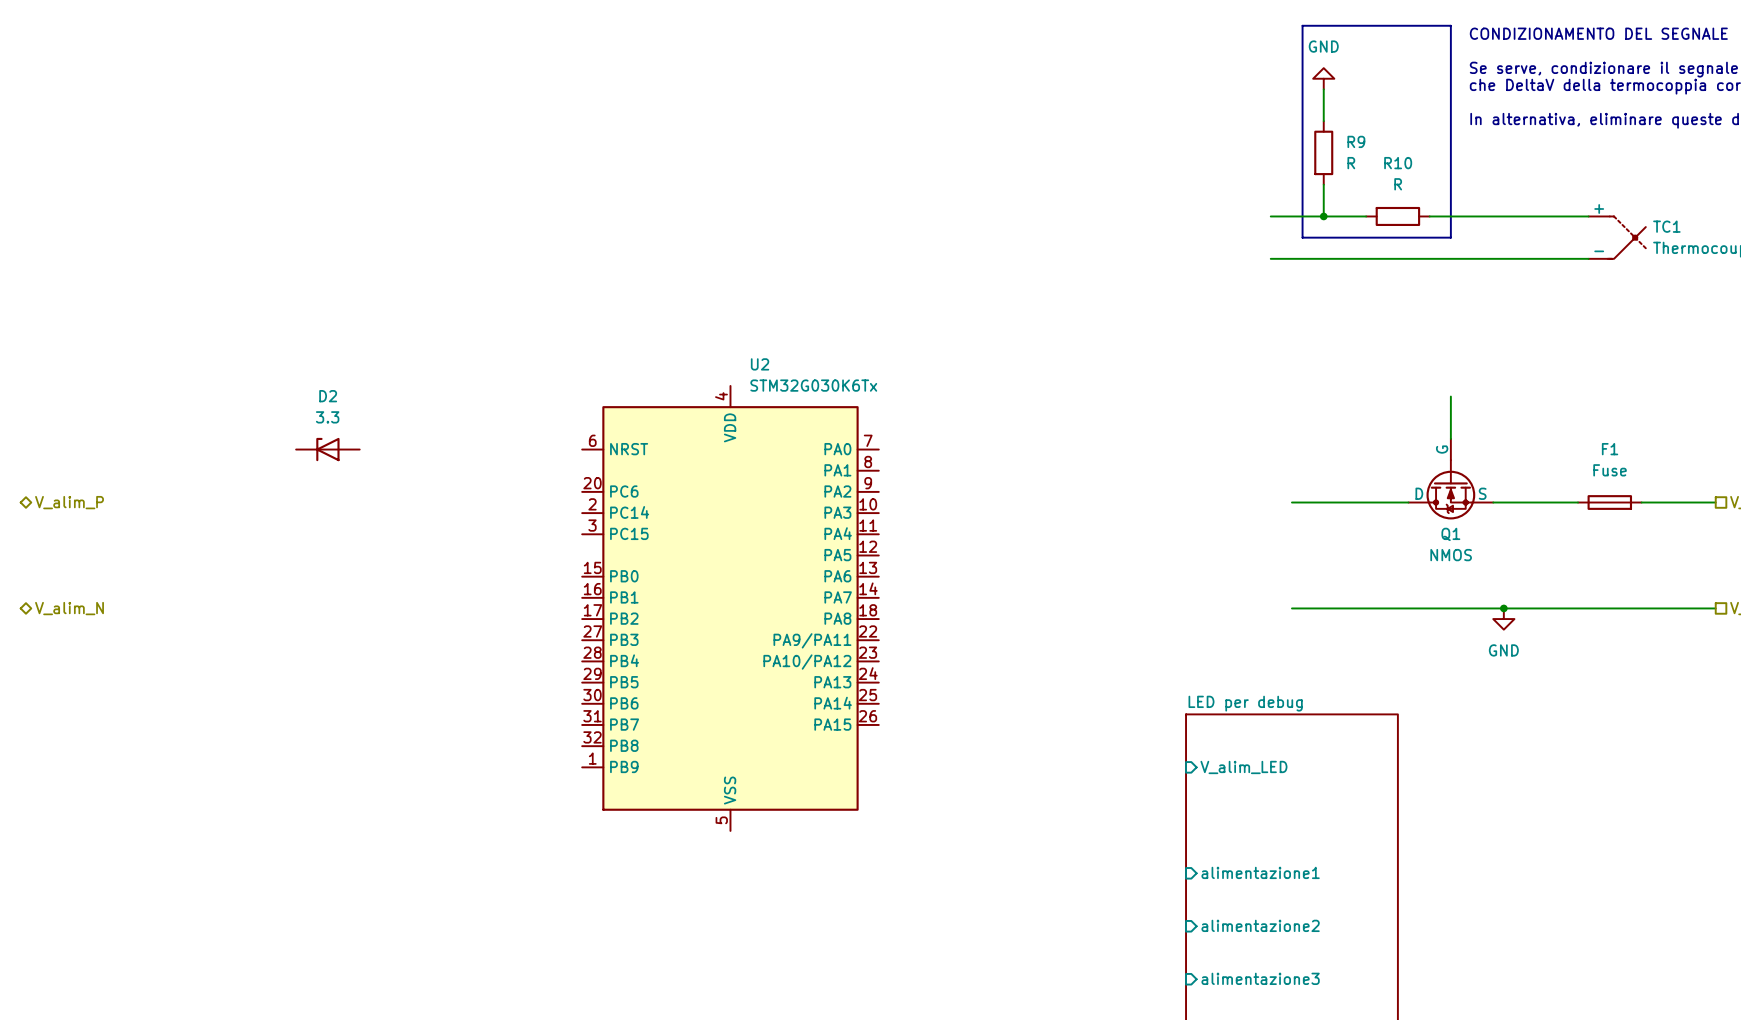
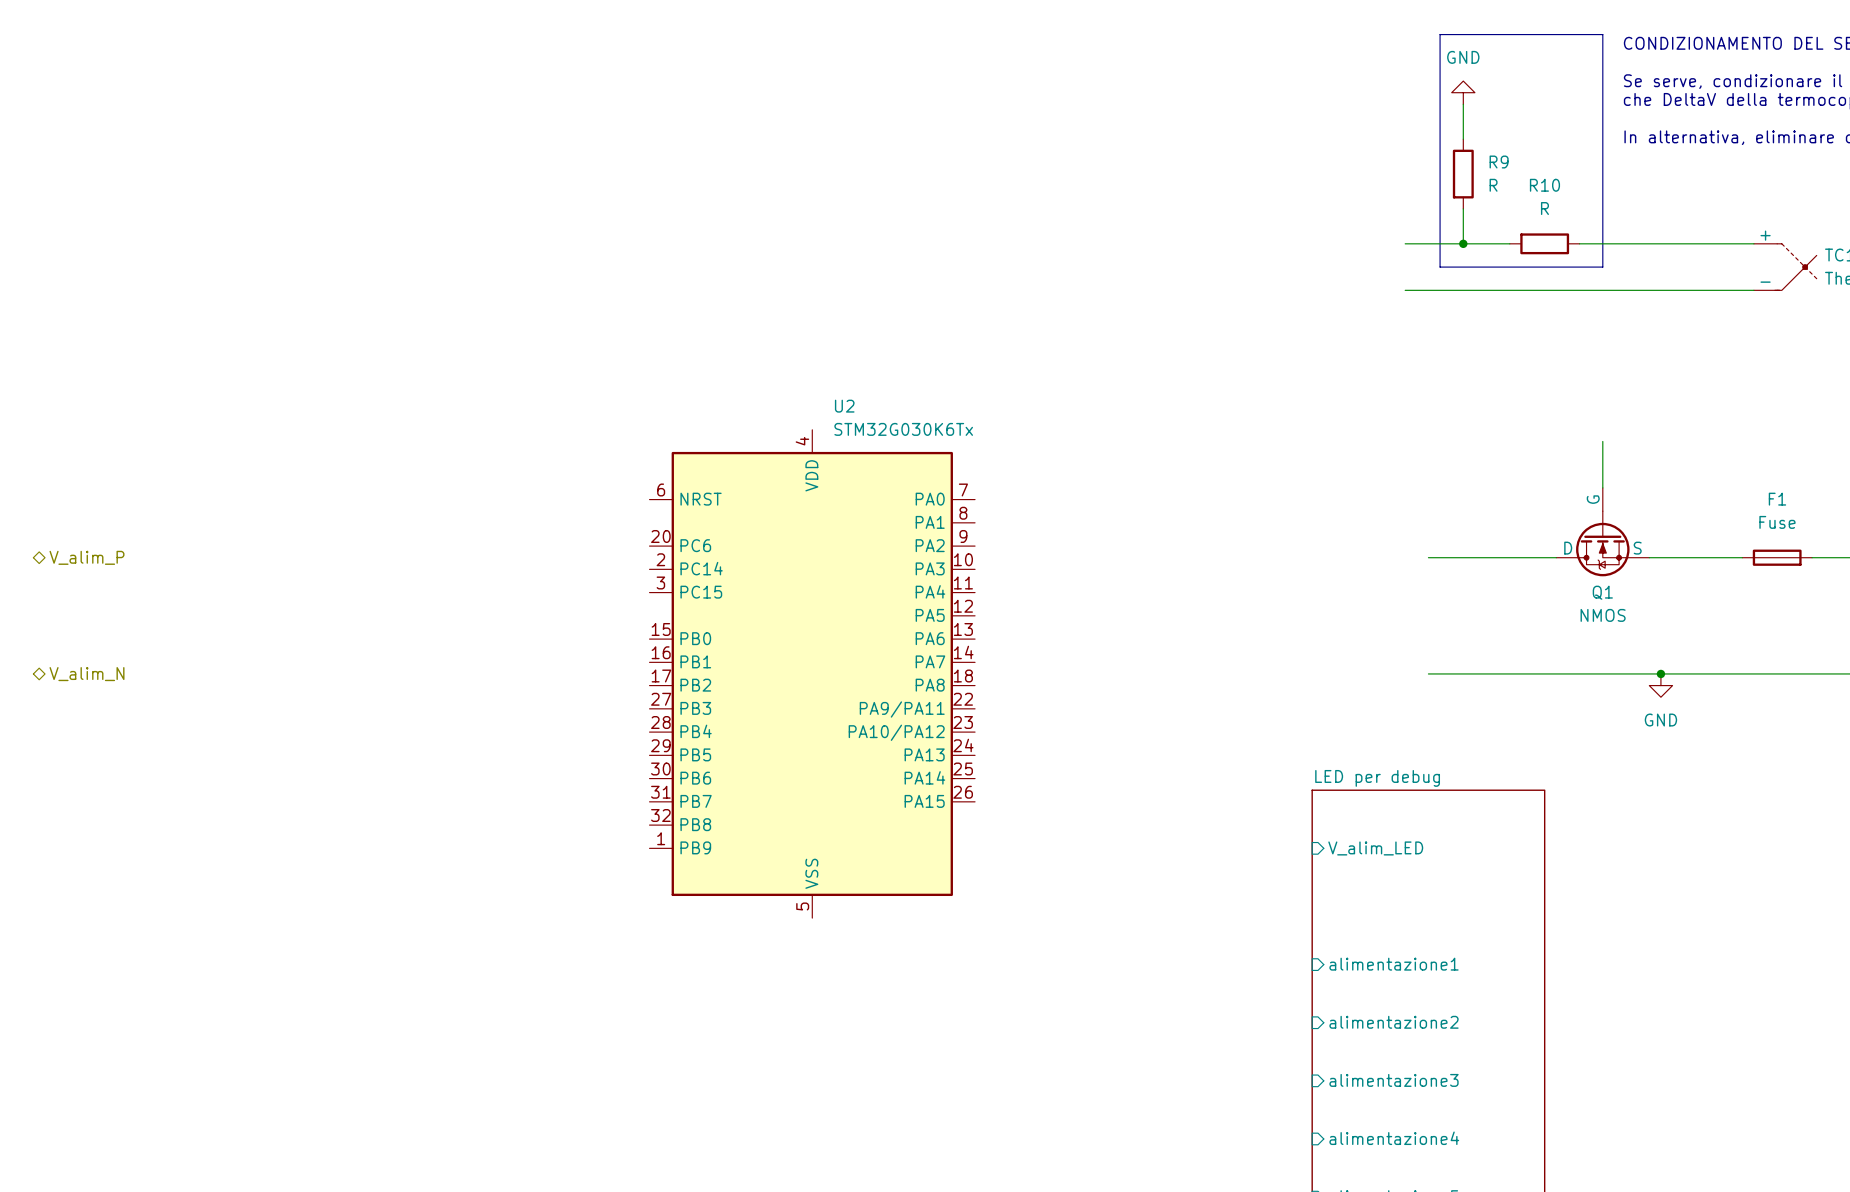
D2: 3.3 (327, 449) -> none

